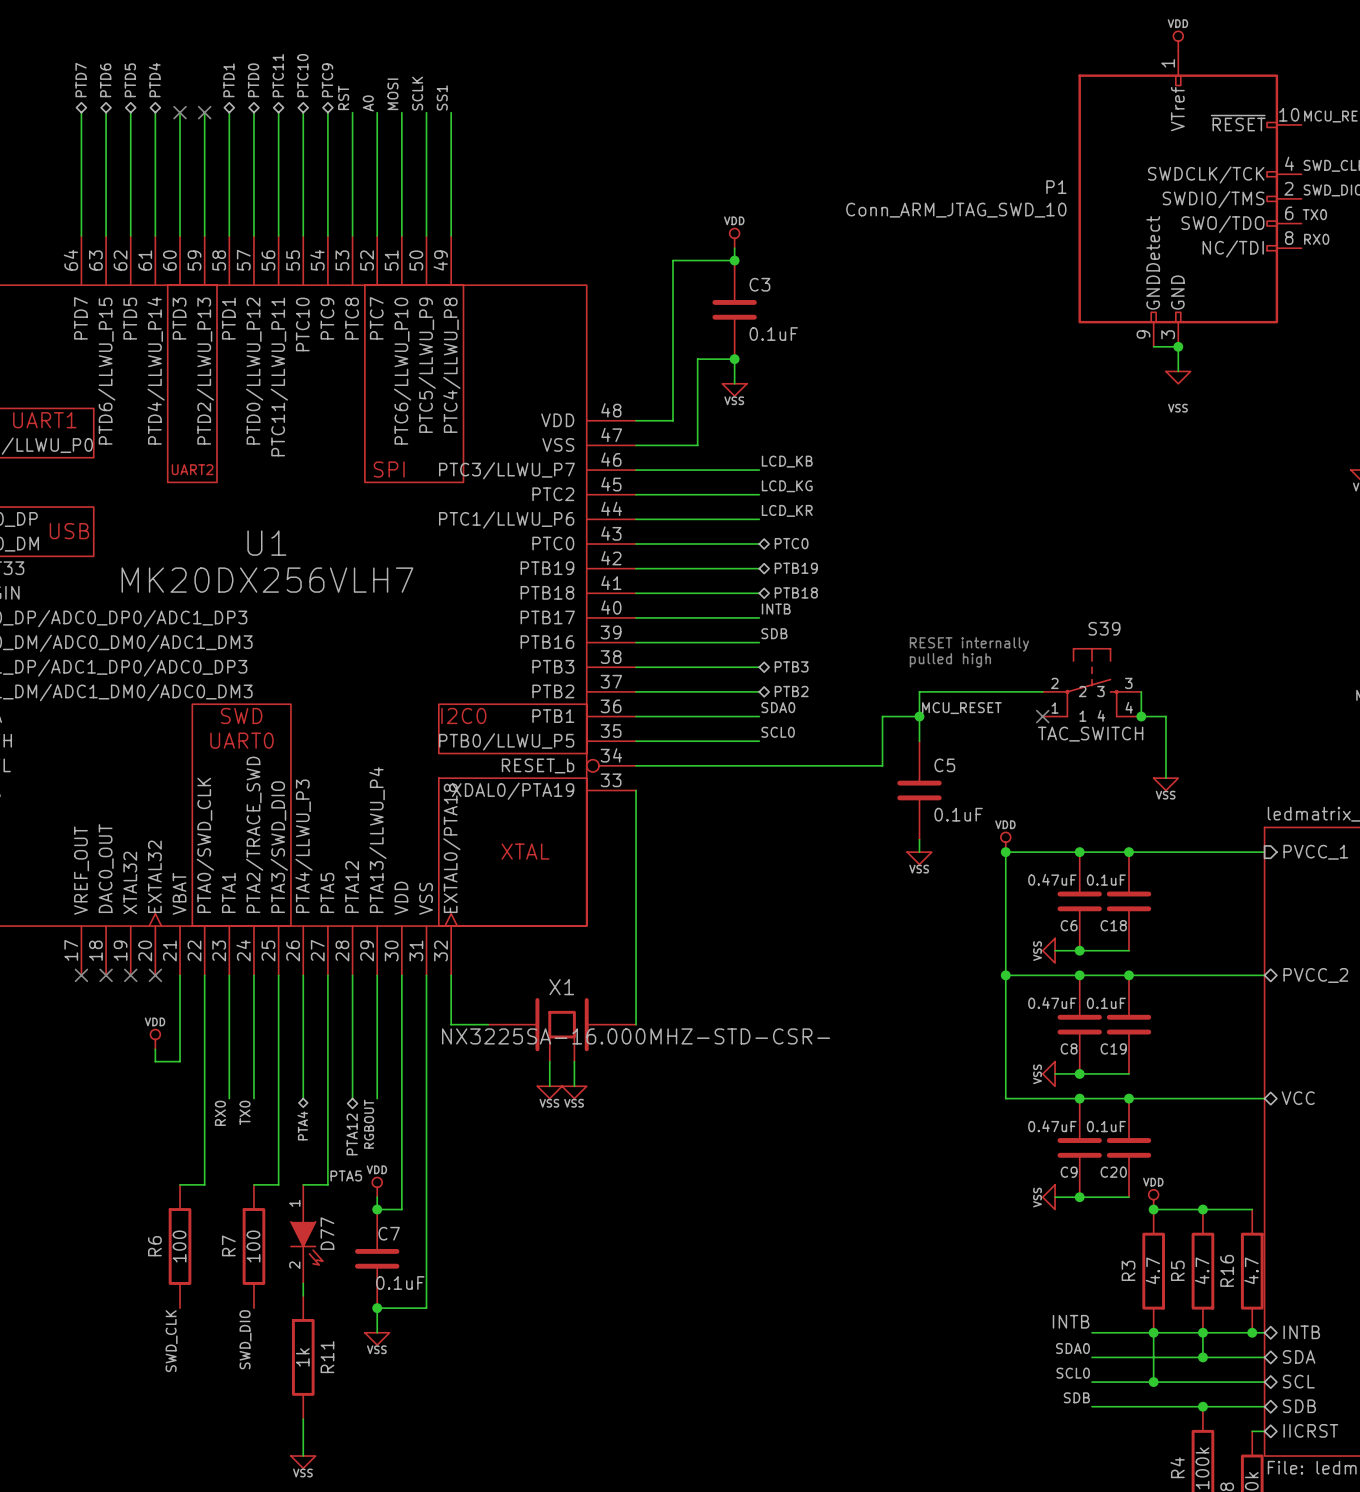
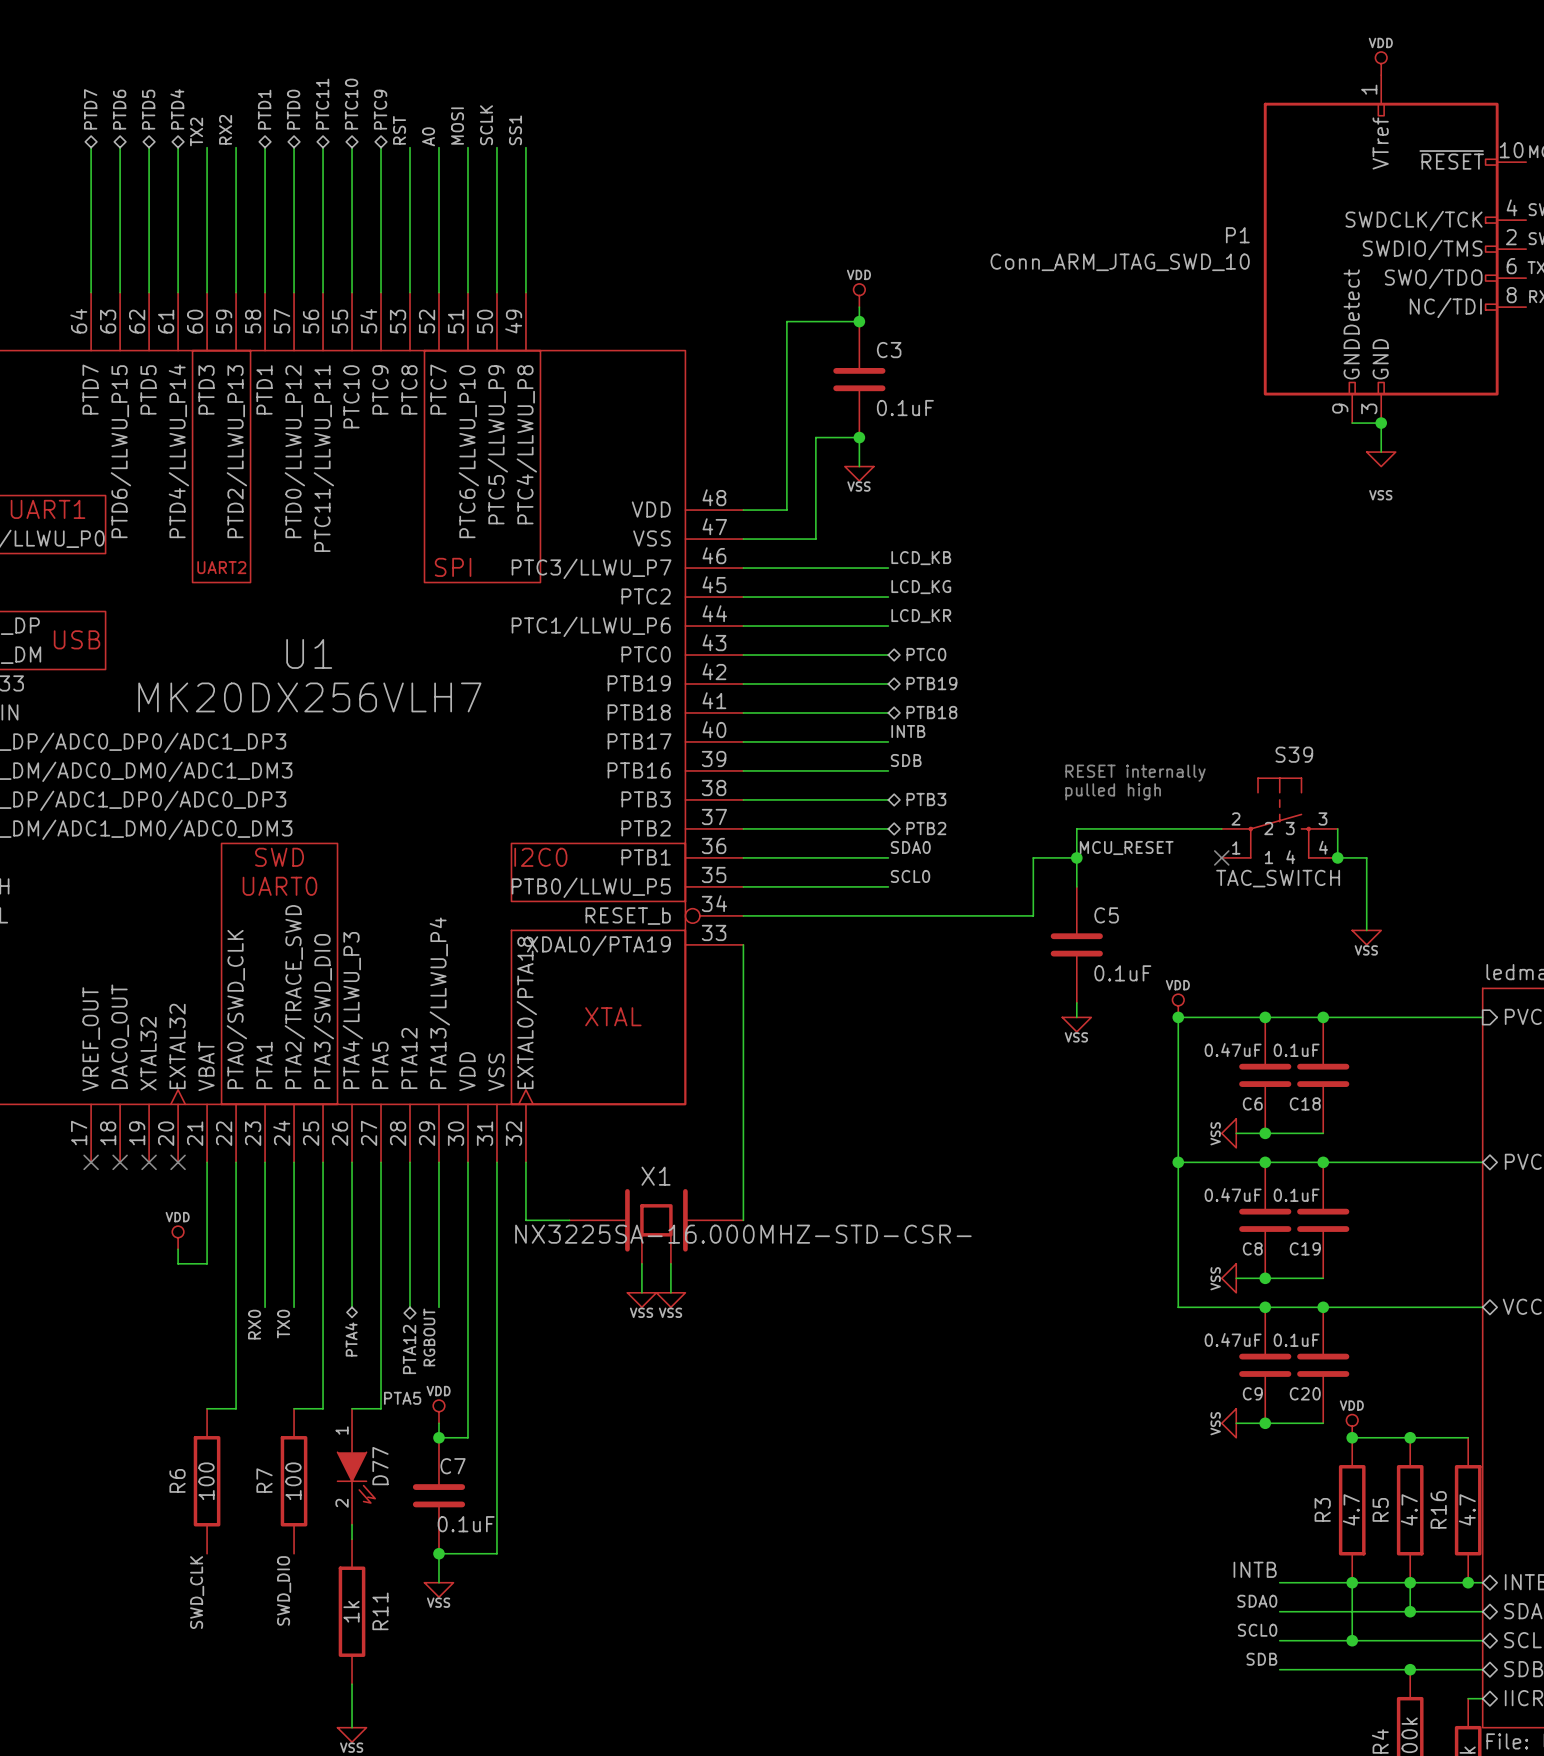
label: none -> RX2 (225, 129)
label: none -> TX2 (196, 131)
no-connect mark: (180, 112) -> none
no-connect mark: (204, 112) -> none

